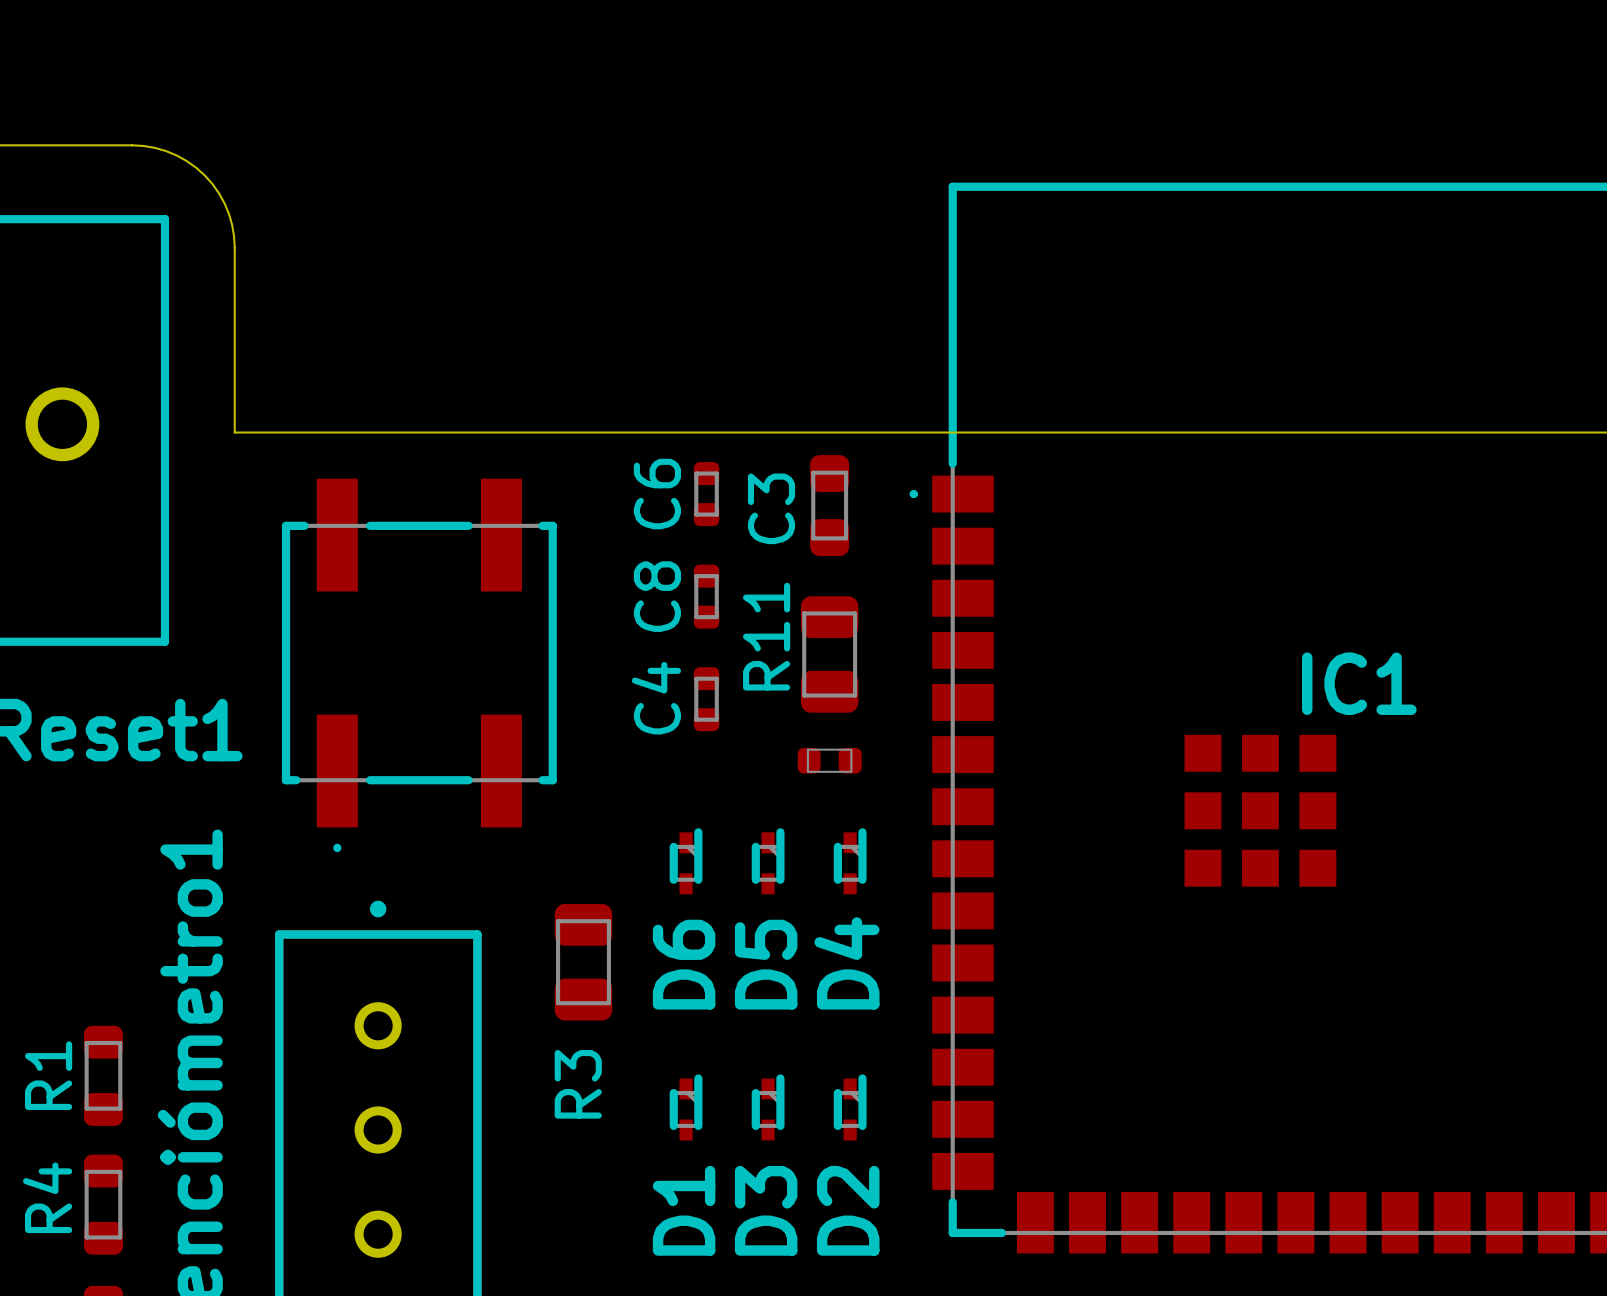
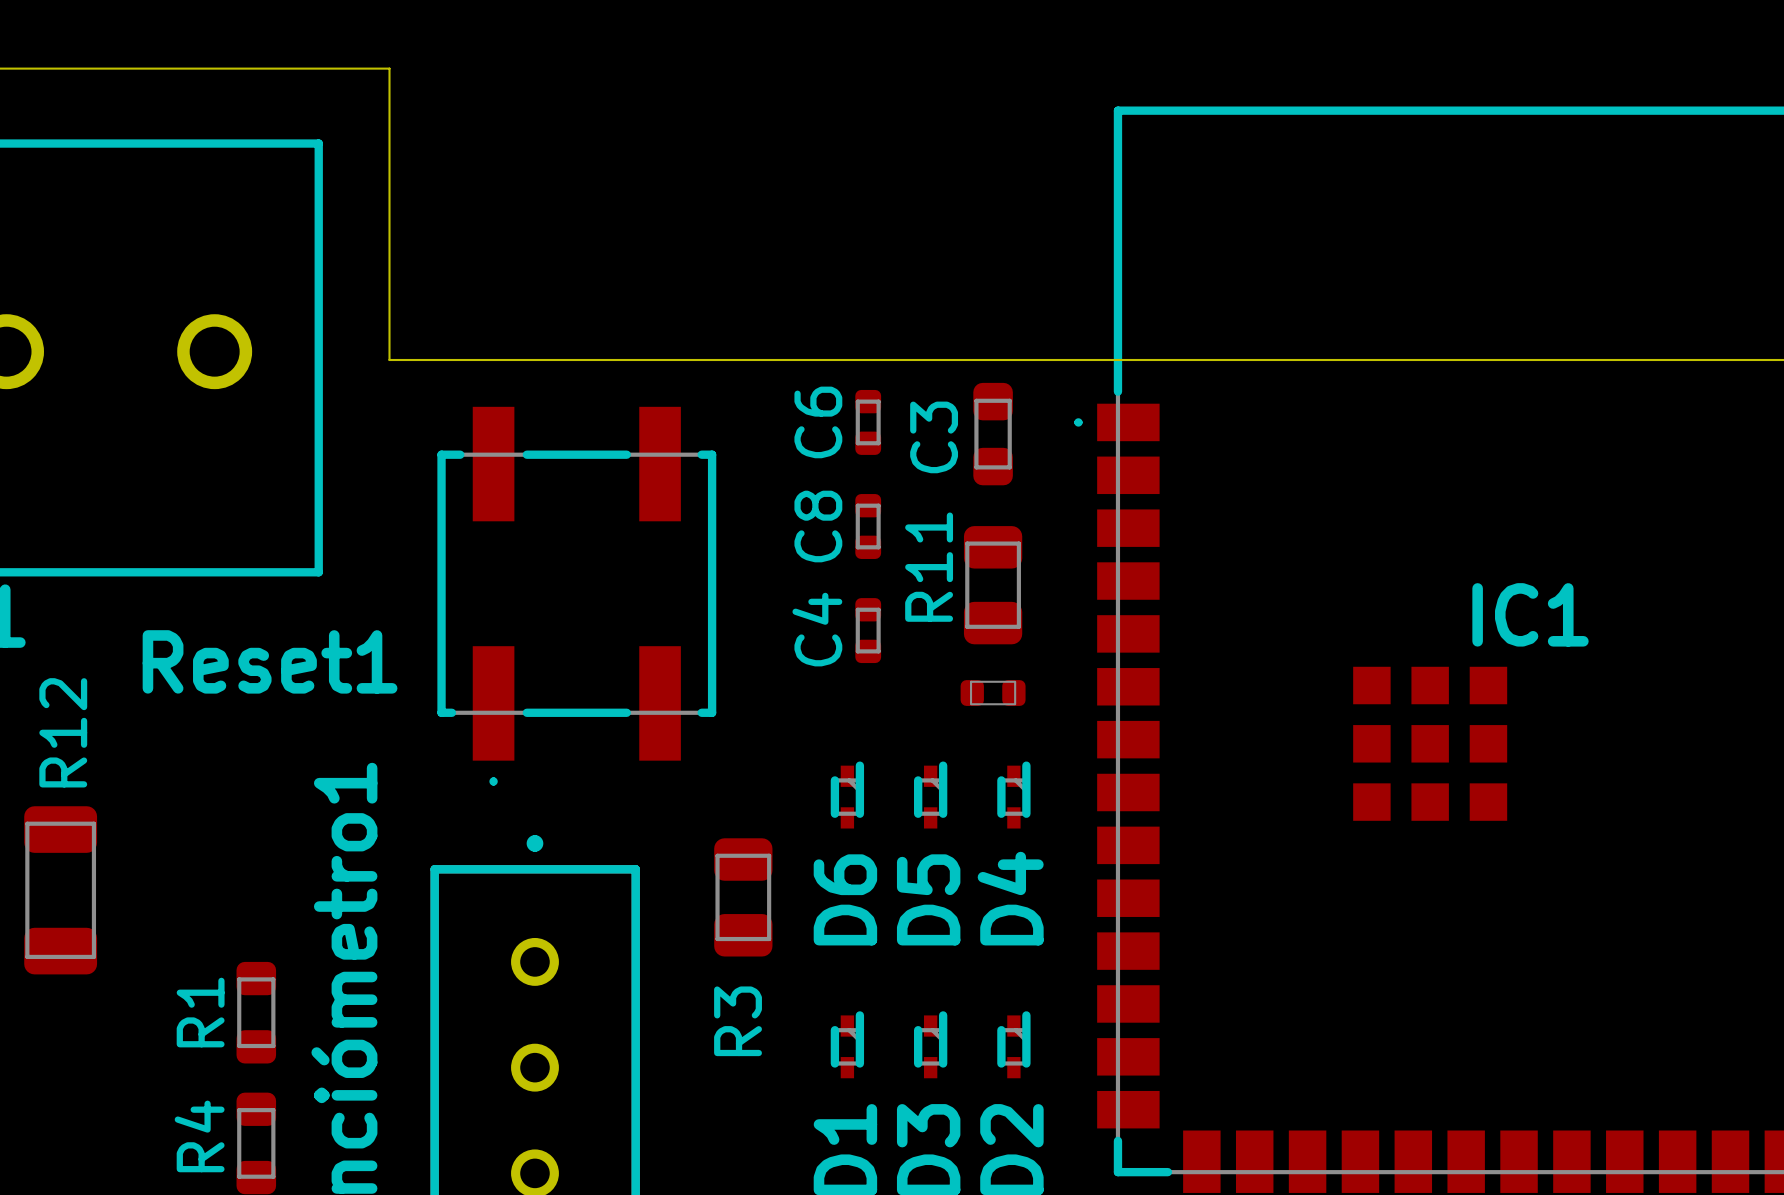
board edge: (132, 145) (166, 151) (186, 161) (204, 175) (224, 203) (232, 225) (234, 247) -> (285, 68) (389, 68) (389, 172)

